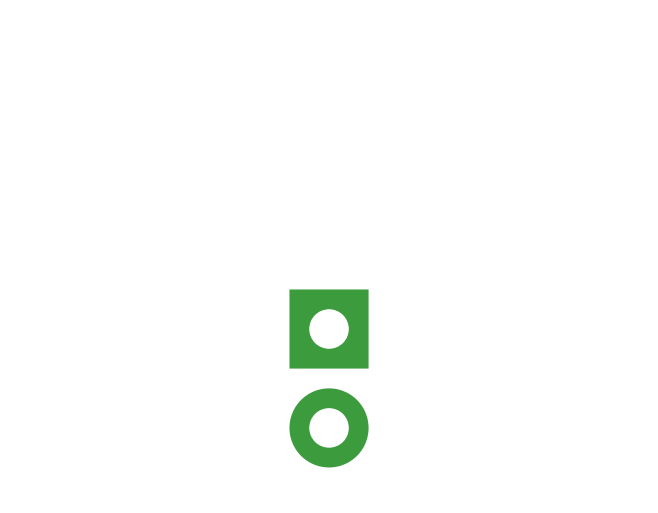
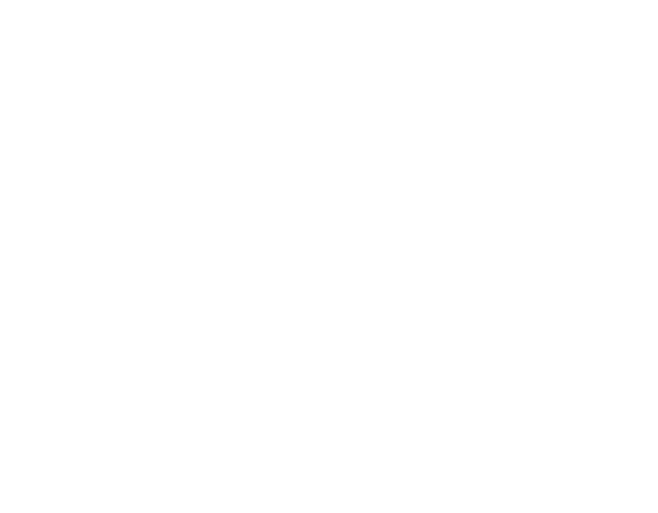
part: (329, 378) -> none

